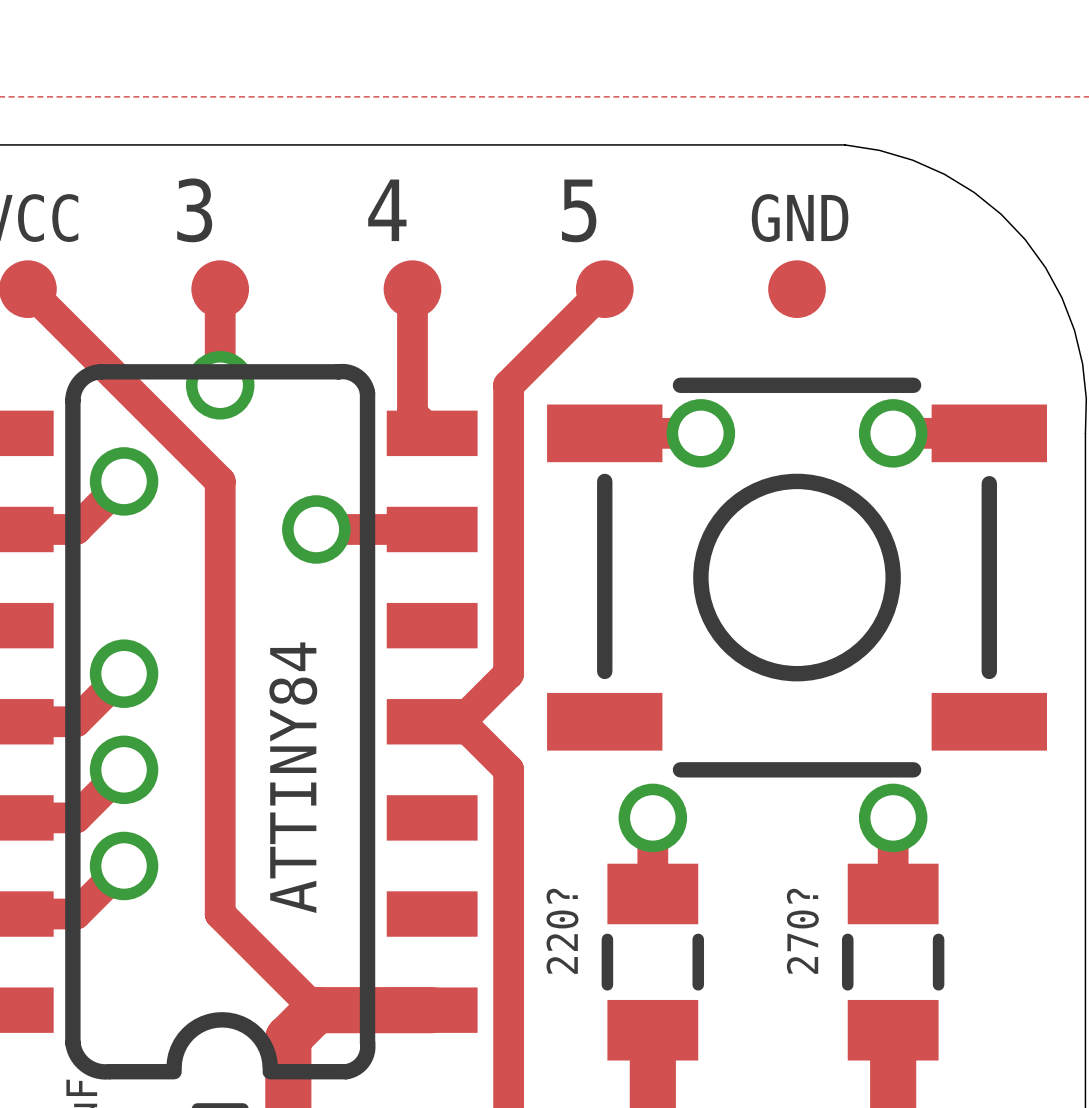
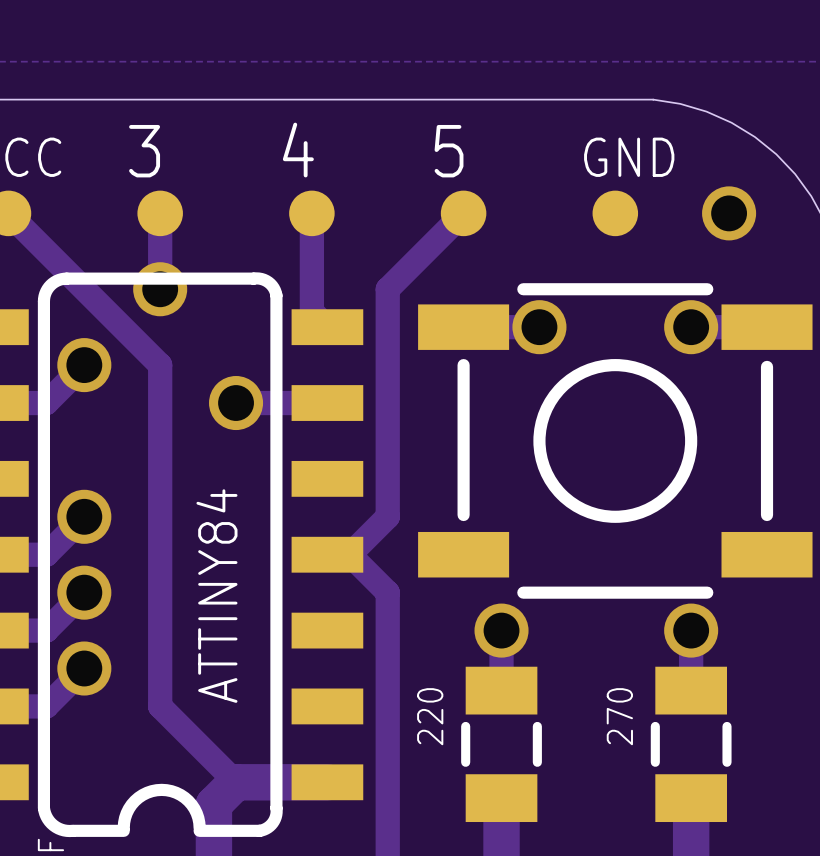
via: none -> (729, 213)
part value: 220? (562, 931) -> 220 (430, 716)
part value: 270? (802, 931) -> 270 (619, 716)

